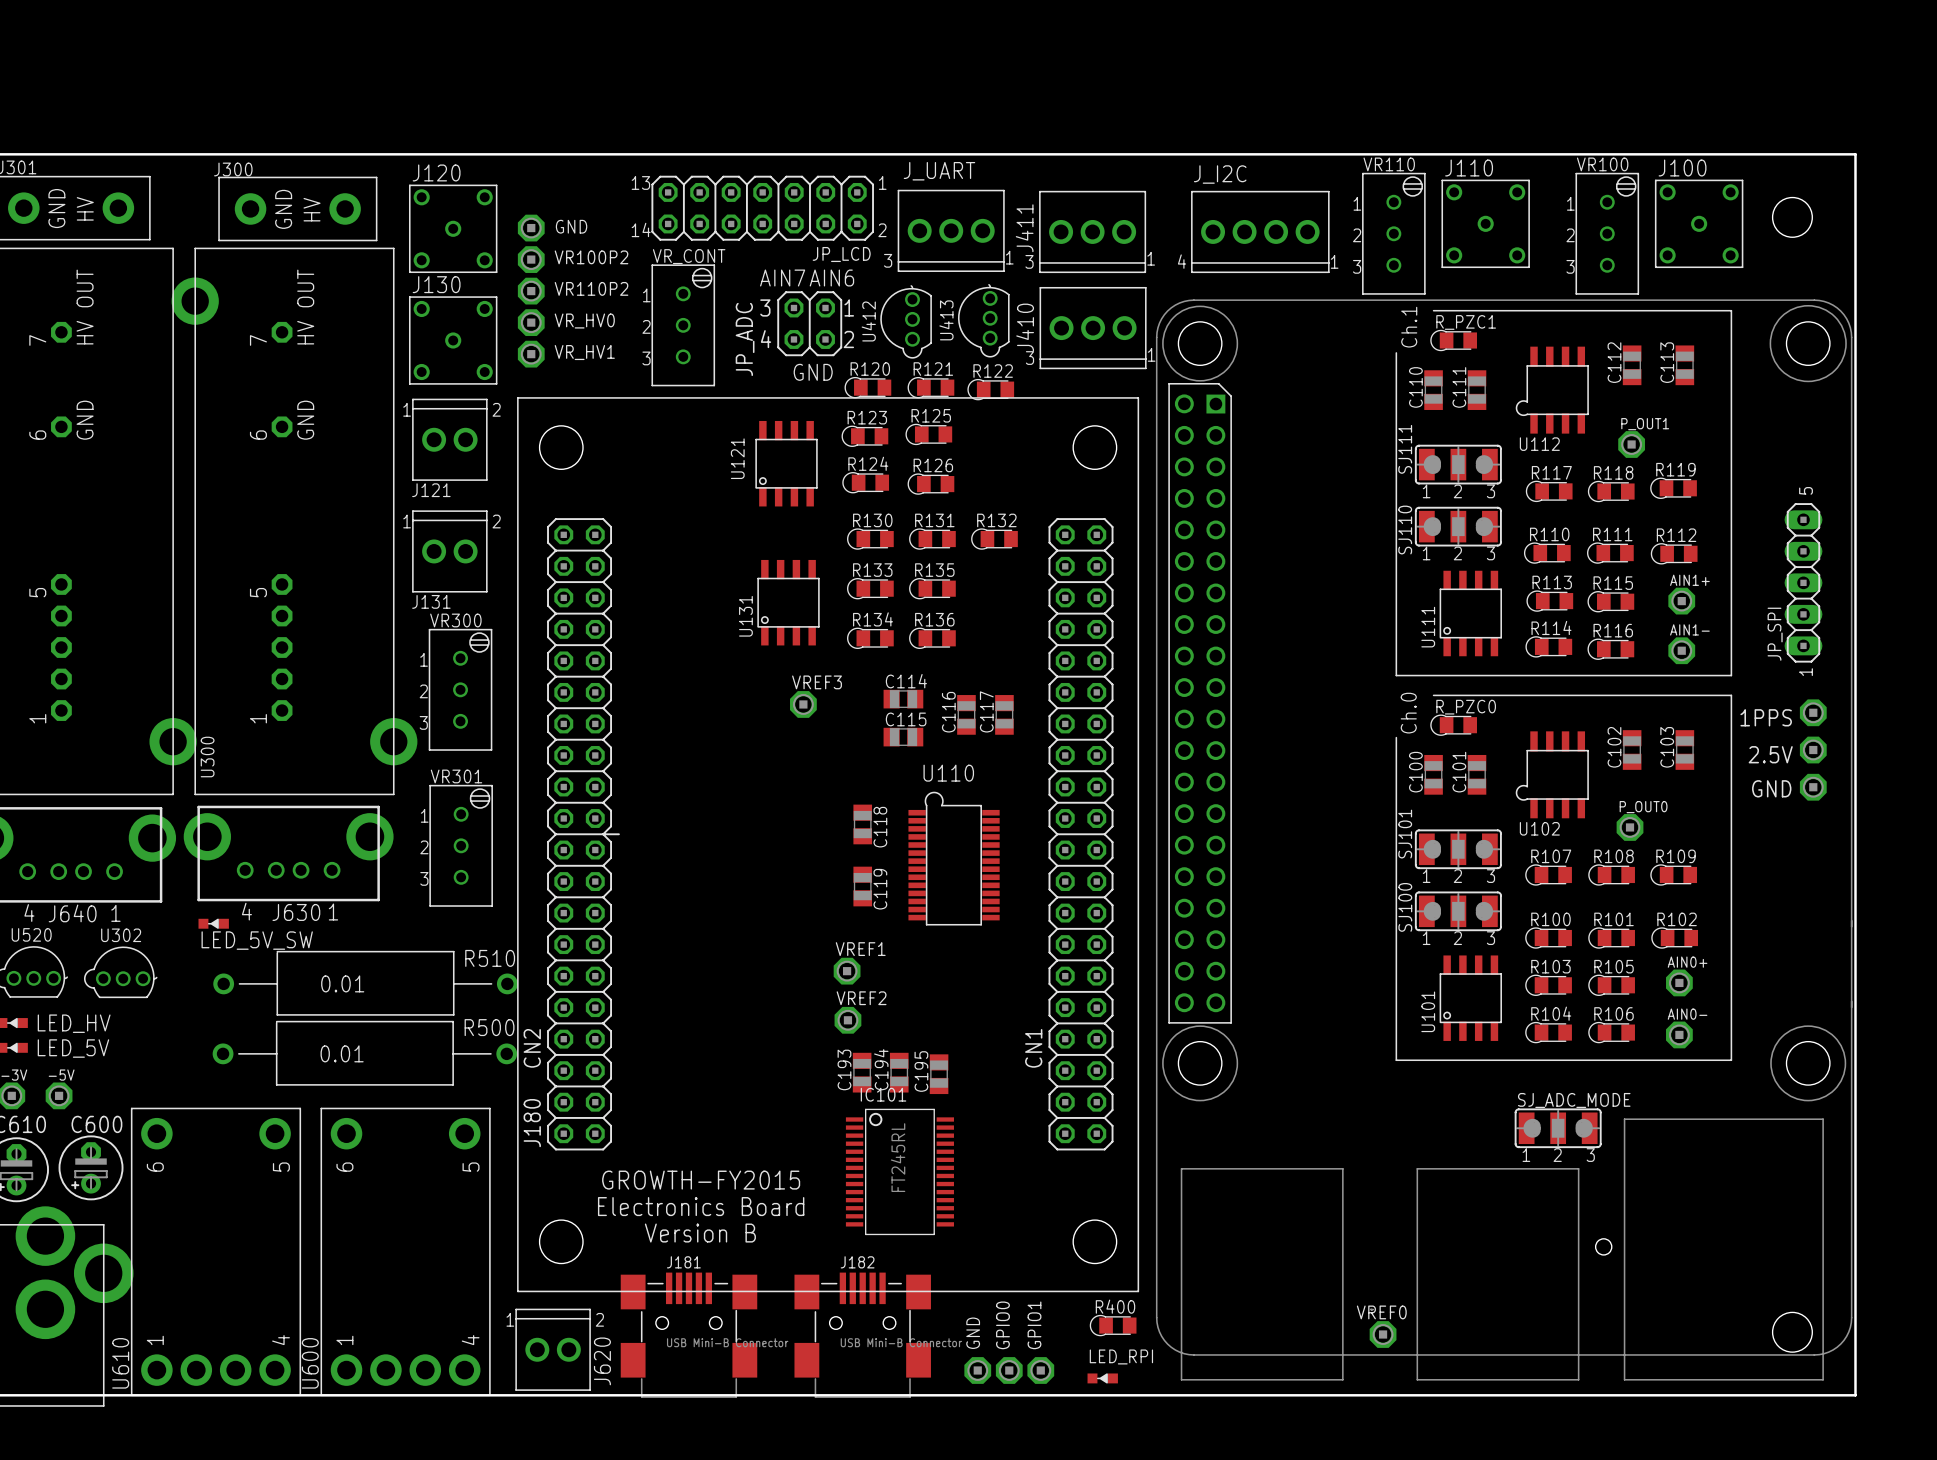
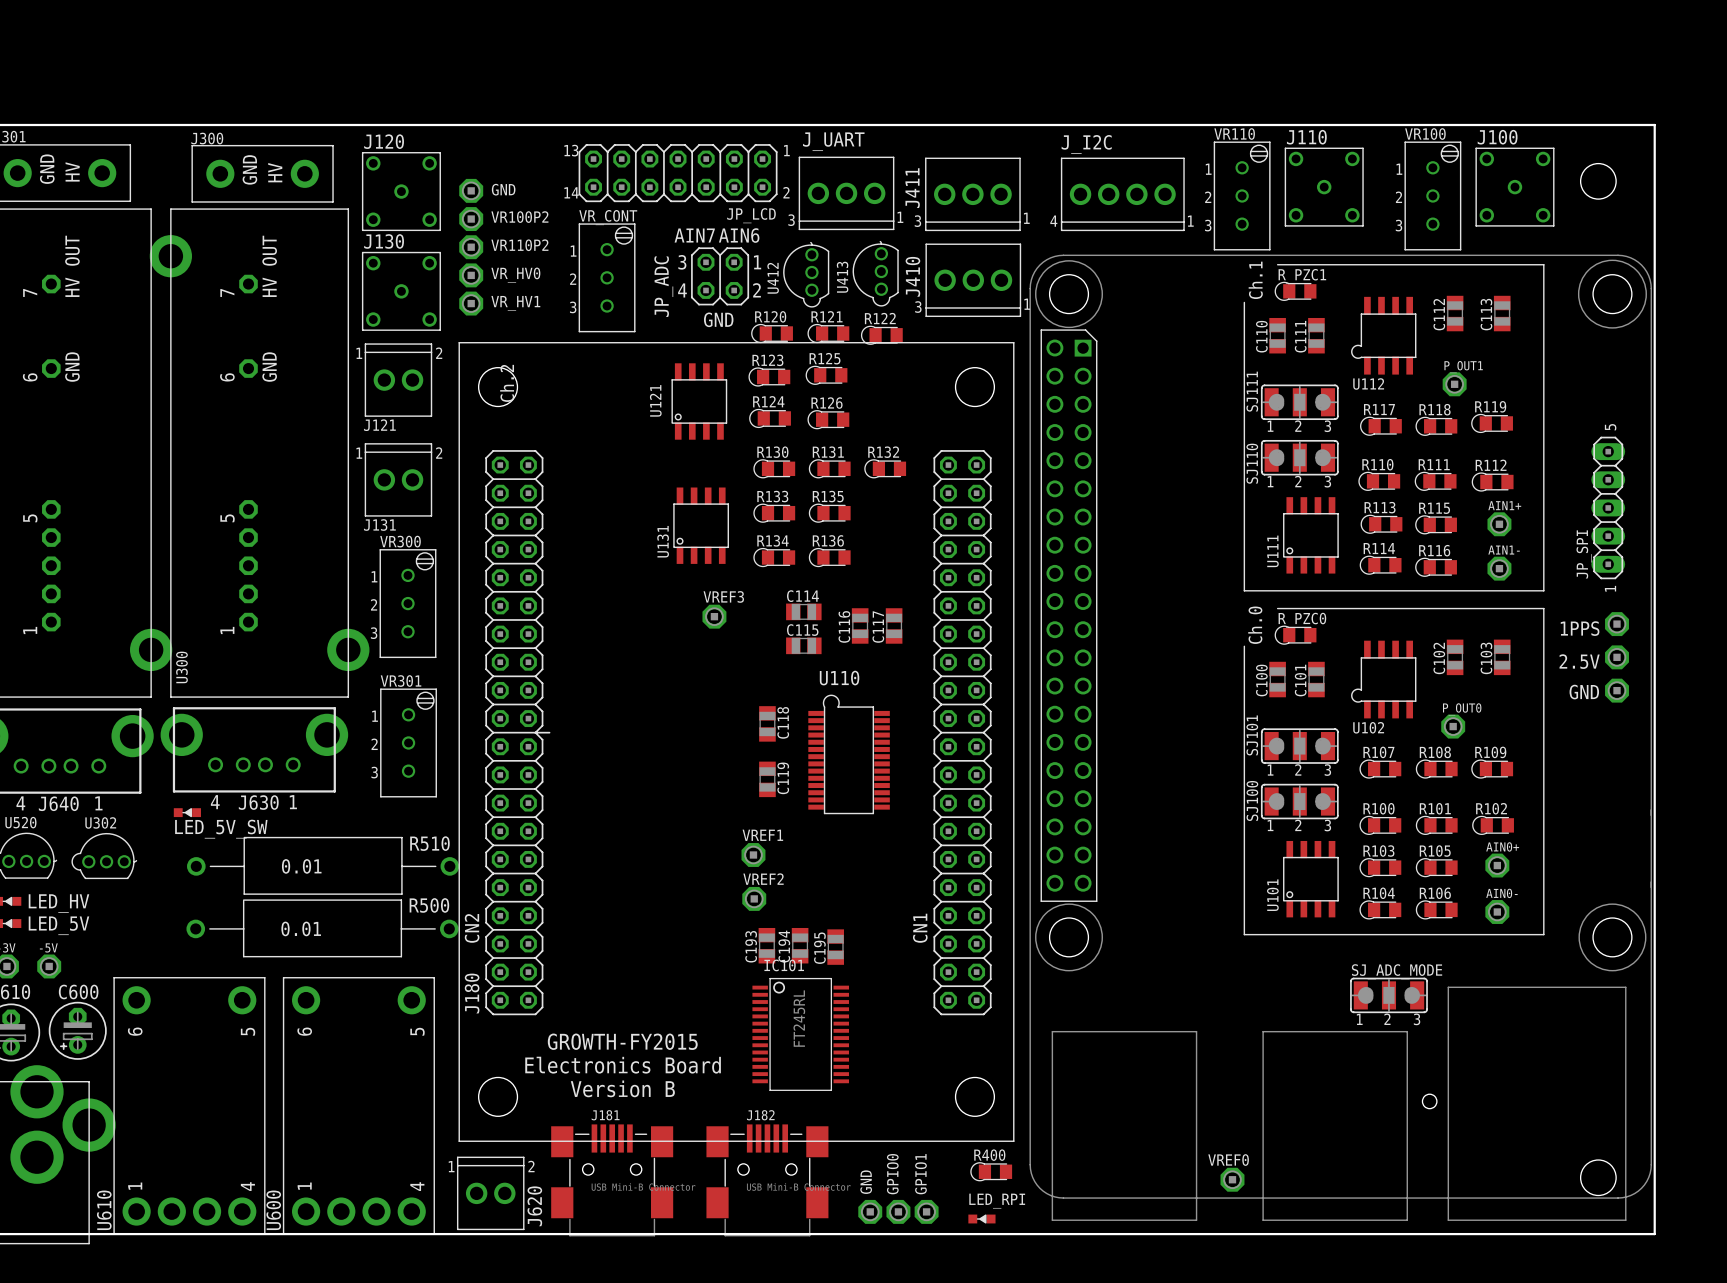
text: none -> Ch.2 (507, 383)

